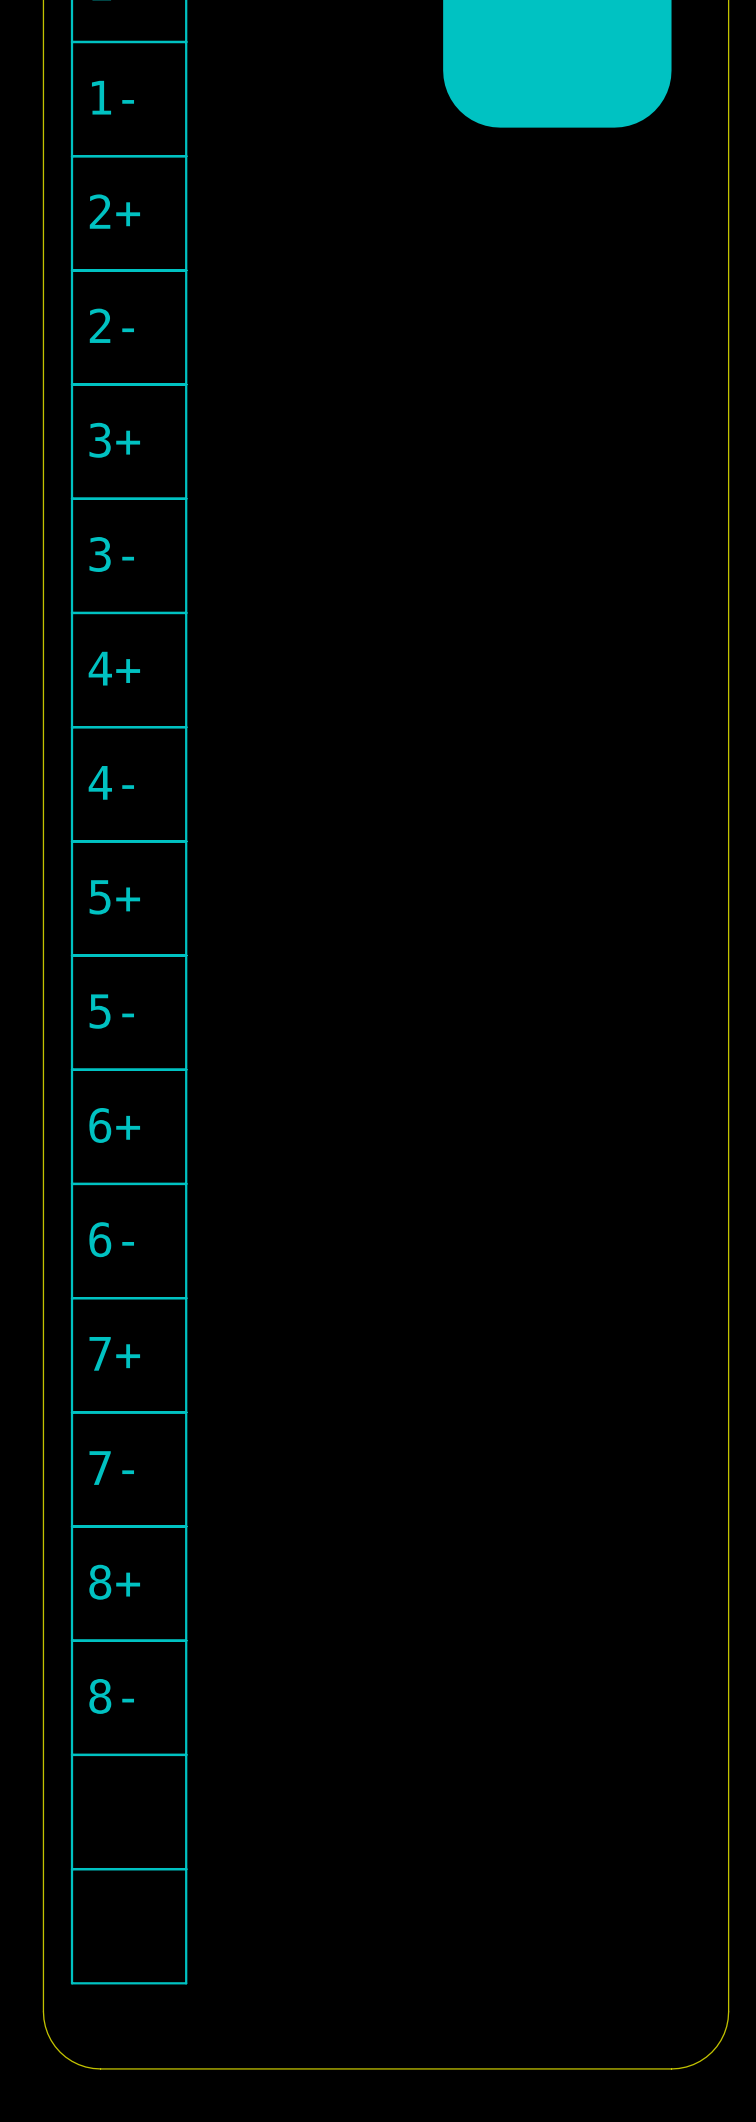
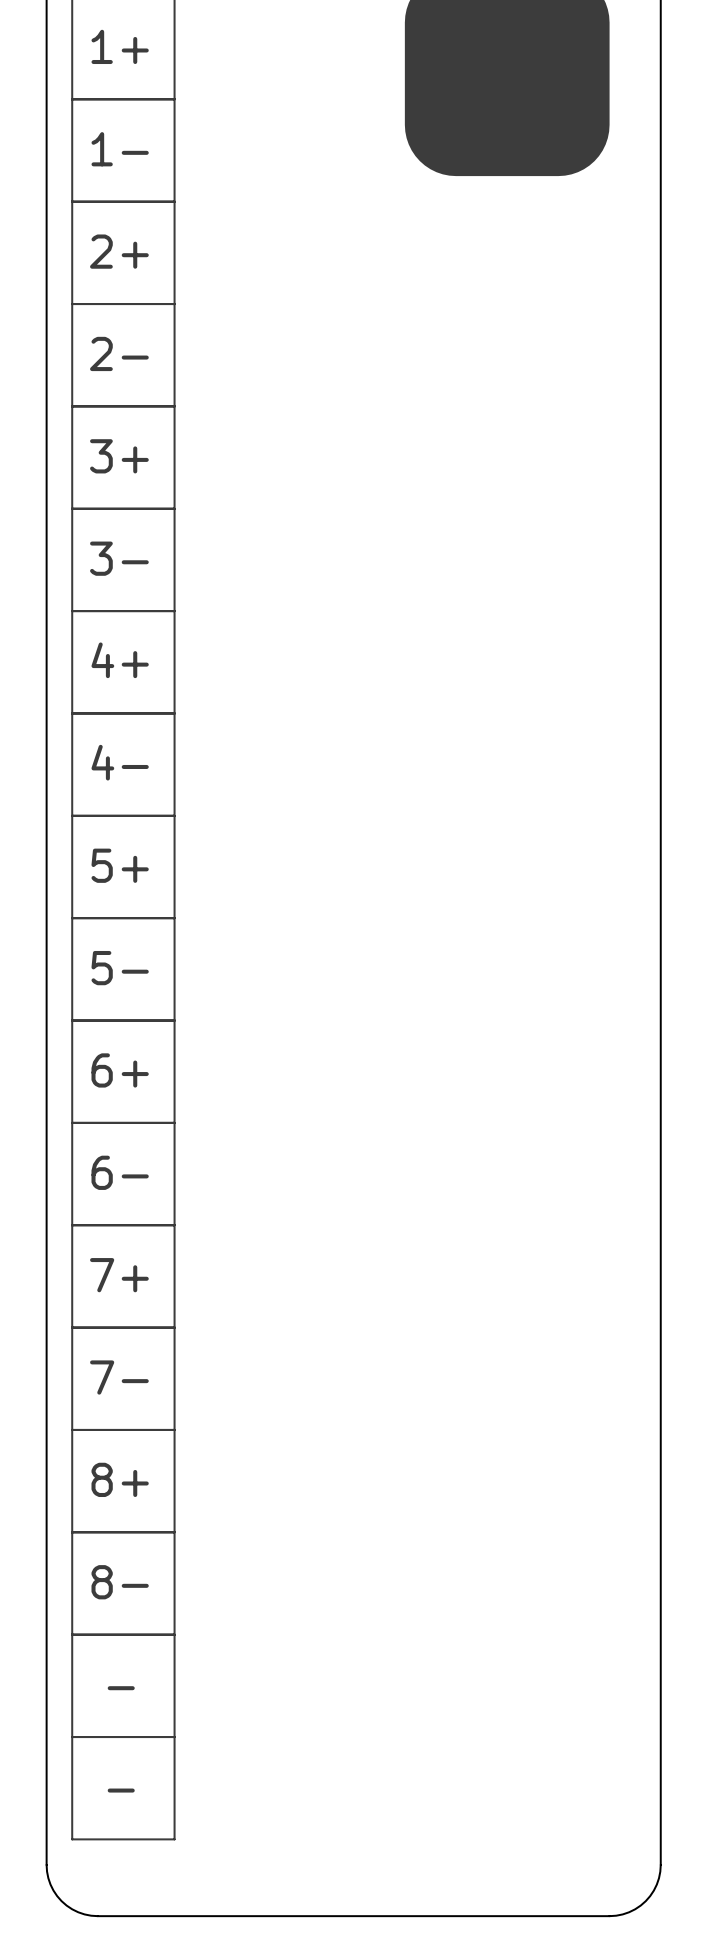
text: none -> - (121, 1688)
text: none -> - (121, 1790)

